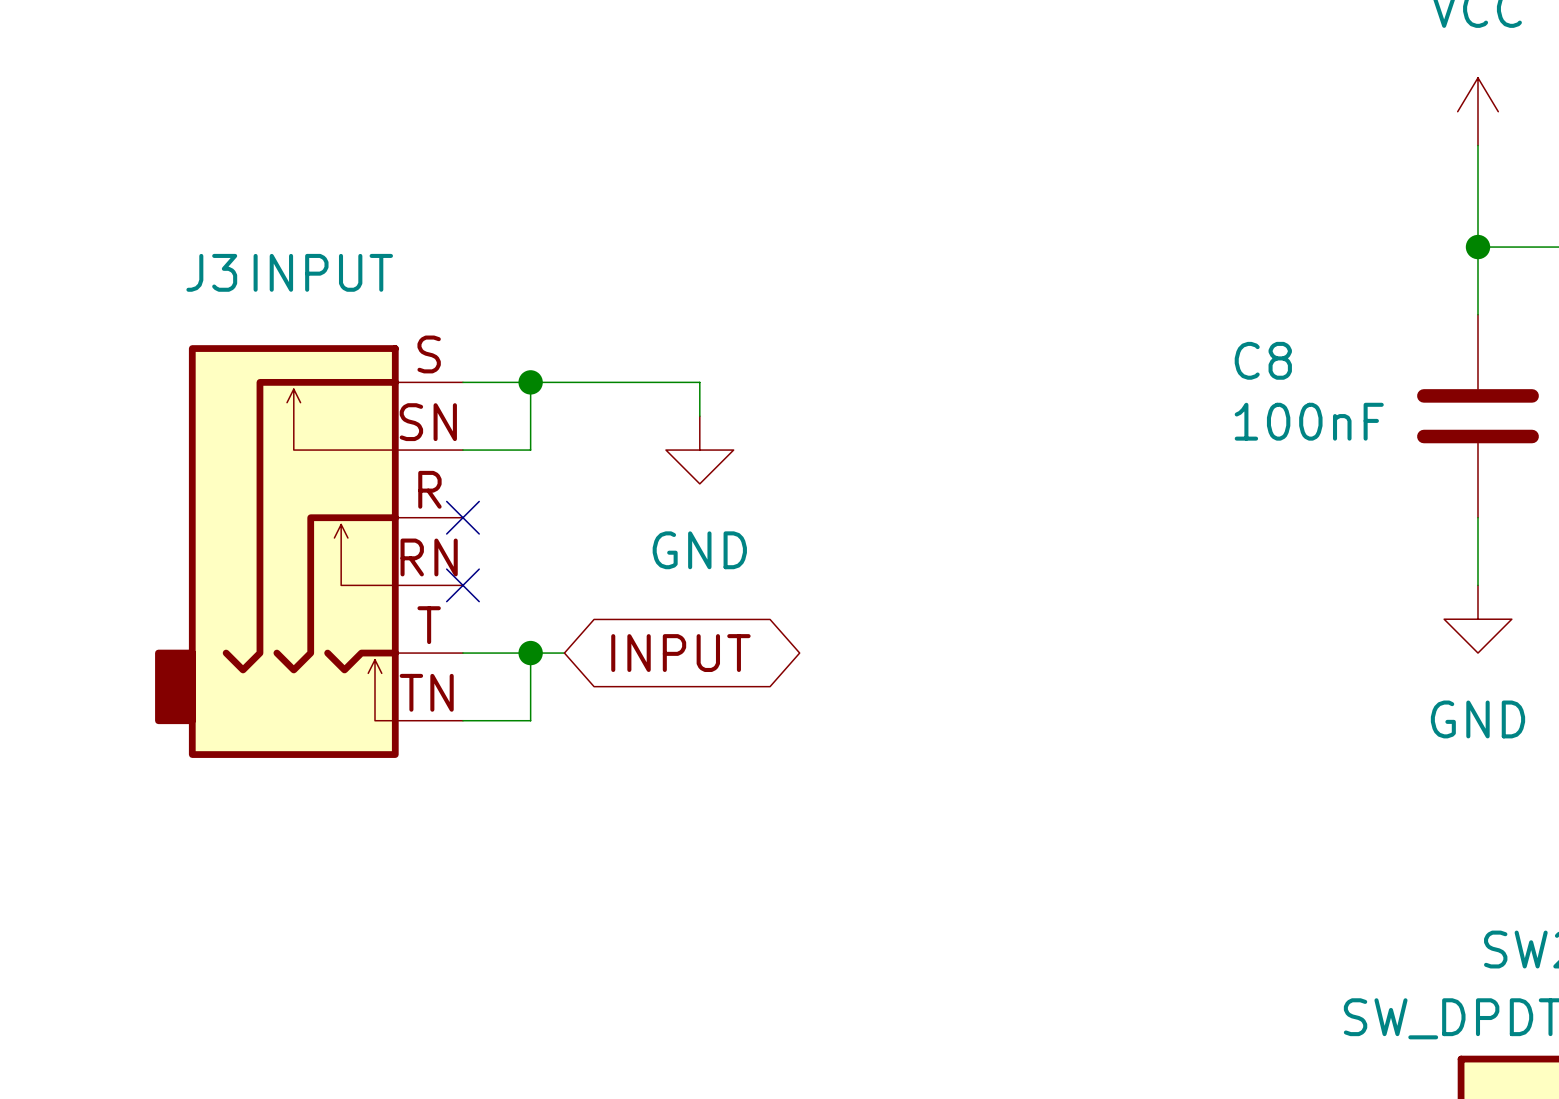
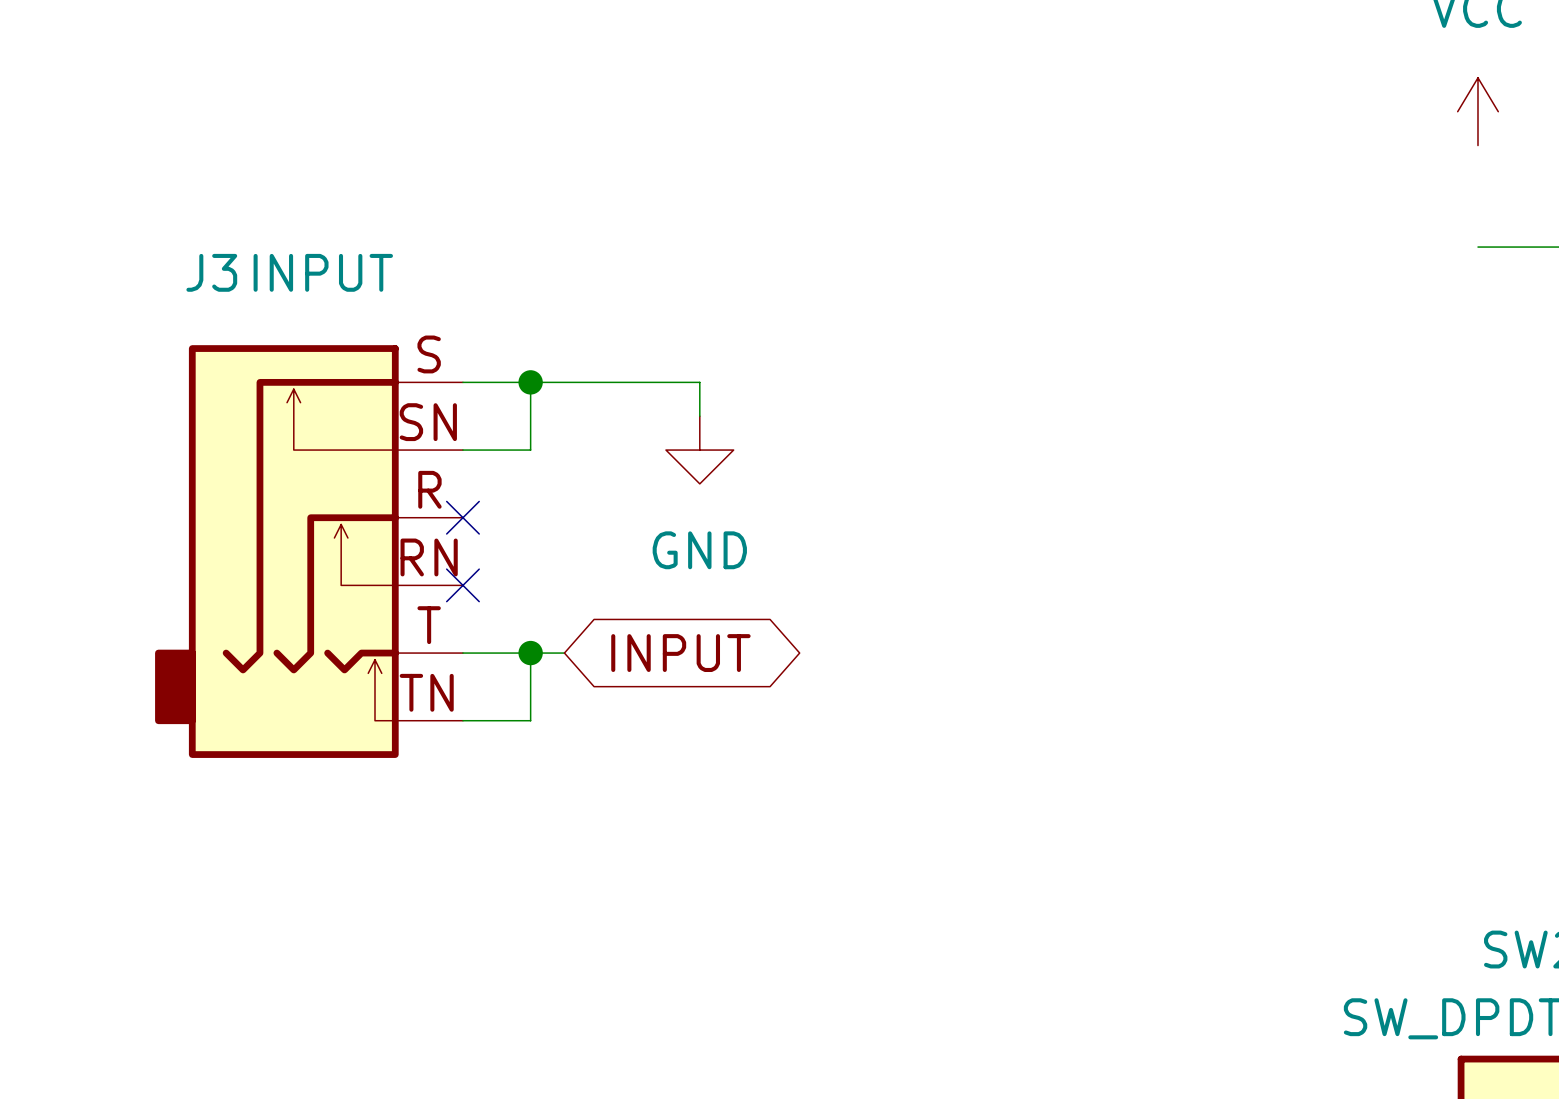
wire: (1477, 145) (1477, 314) -> none
junction: (1477, 247) -> none
C8: 100nF (1477, 416) -> none
wire: (1477, 517) (1477, 585) -> none
power symbol: GND (1477, 619) -> none

